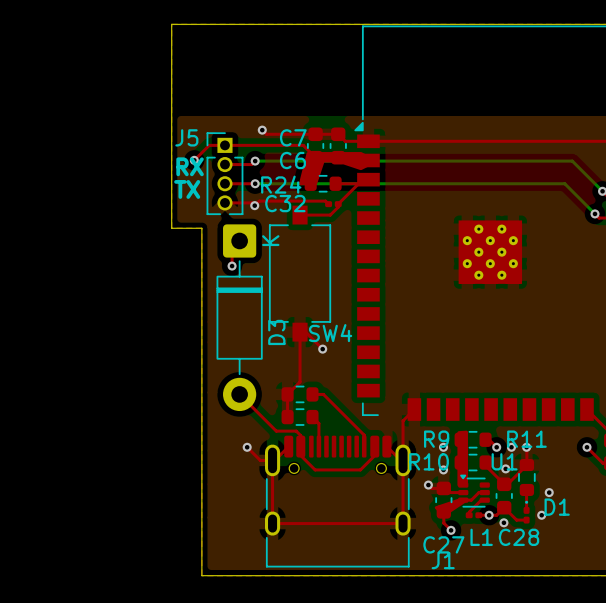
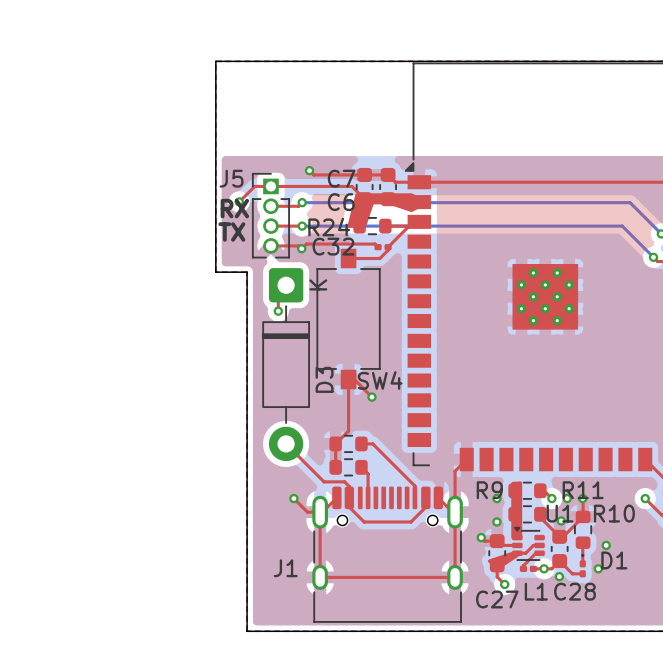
R10 name position: R10 (429, 461) -> R10 (614, 513)
J1 name position: J1 (443, 560) -> J1 (285, 568)

